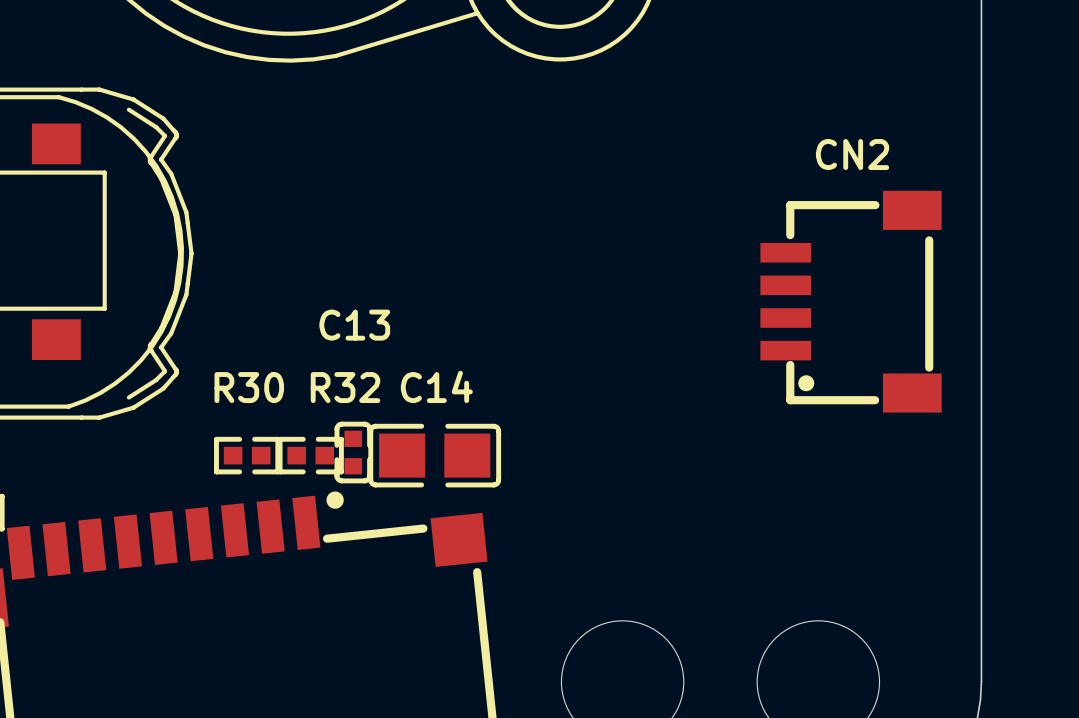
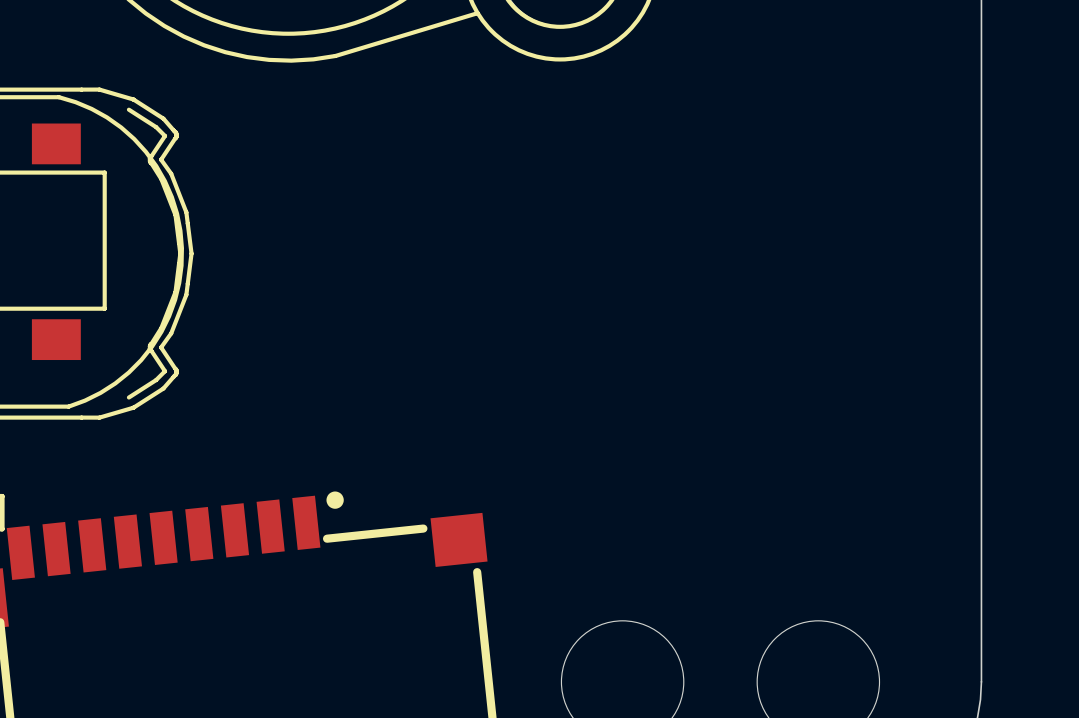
CN2: (851, 301) -> none
C13: (353, 452) -> none
R30: (247, 455) -> none
R32: (310, 455) -> none
C14: (434, 455) -> none

